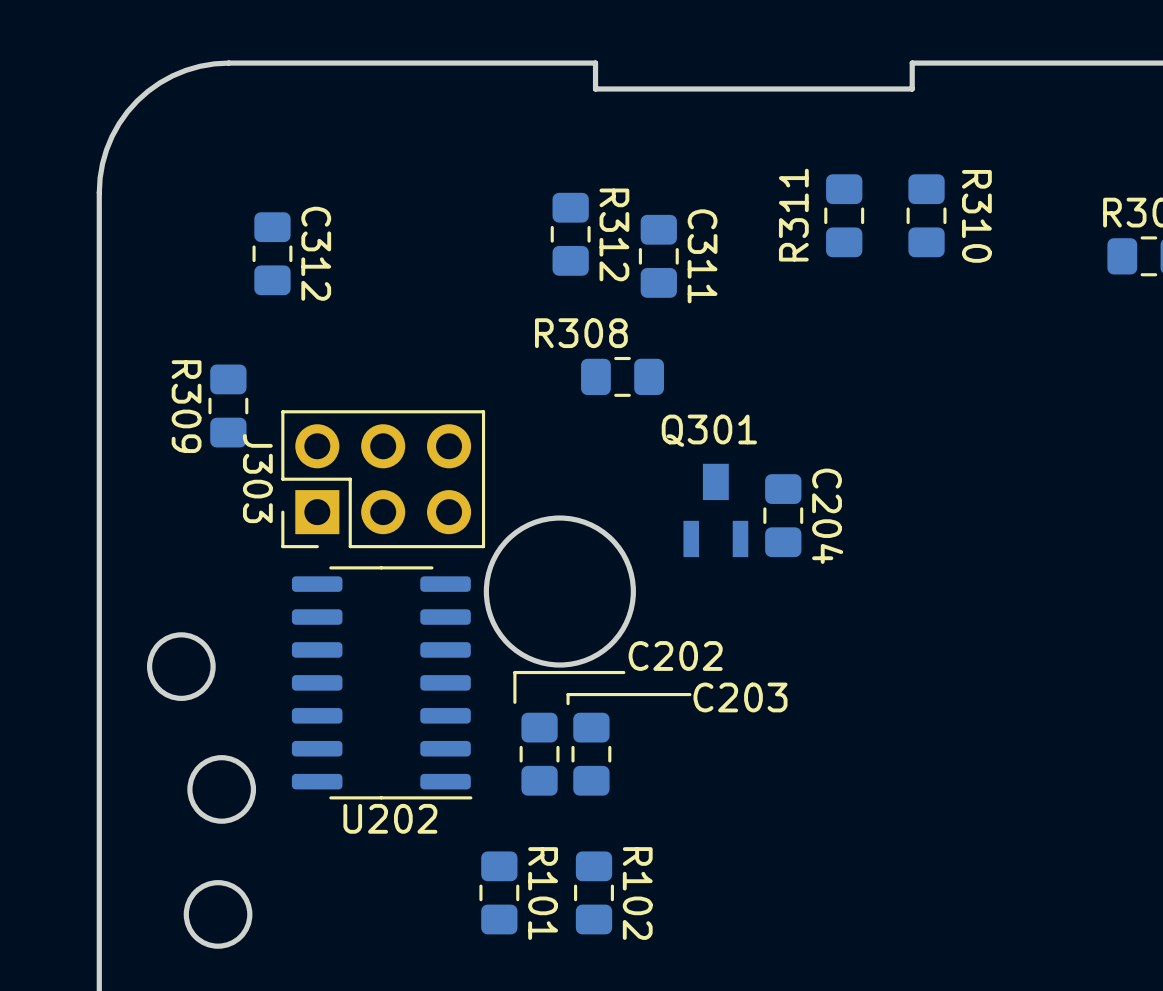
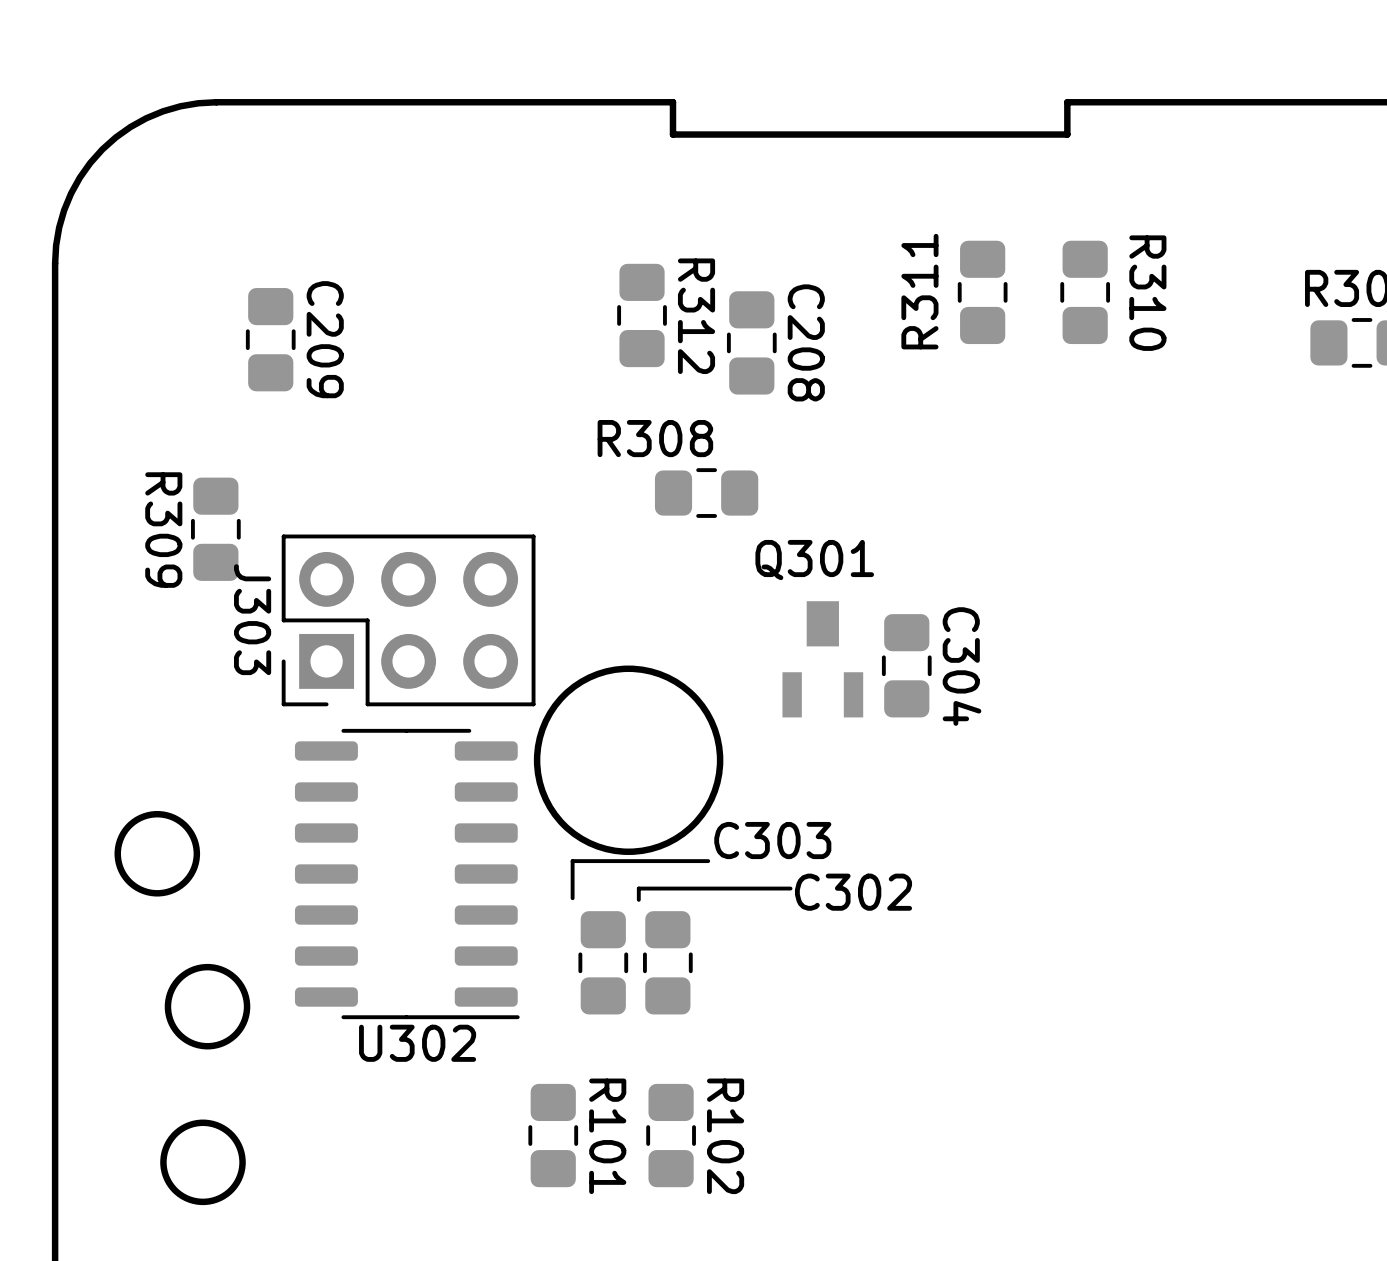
C312 name: C312 (316, 253) -> C209 (325, 339)
C311 name: C311 (702, 256) -> C208 (806, 342)
C204 name: C204 (827, 516) -> C304 (962, 666)
C202 name: C202 (675, 655) -> C303 (772, 840)
C203 name: C203 (740, 697) -> C302 (853, 892)
U202 name: U202 (390, 818) -> U302 (417, 1043)

